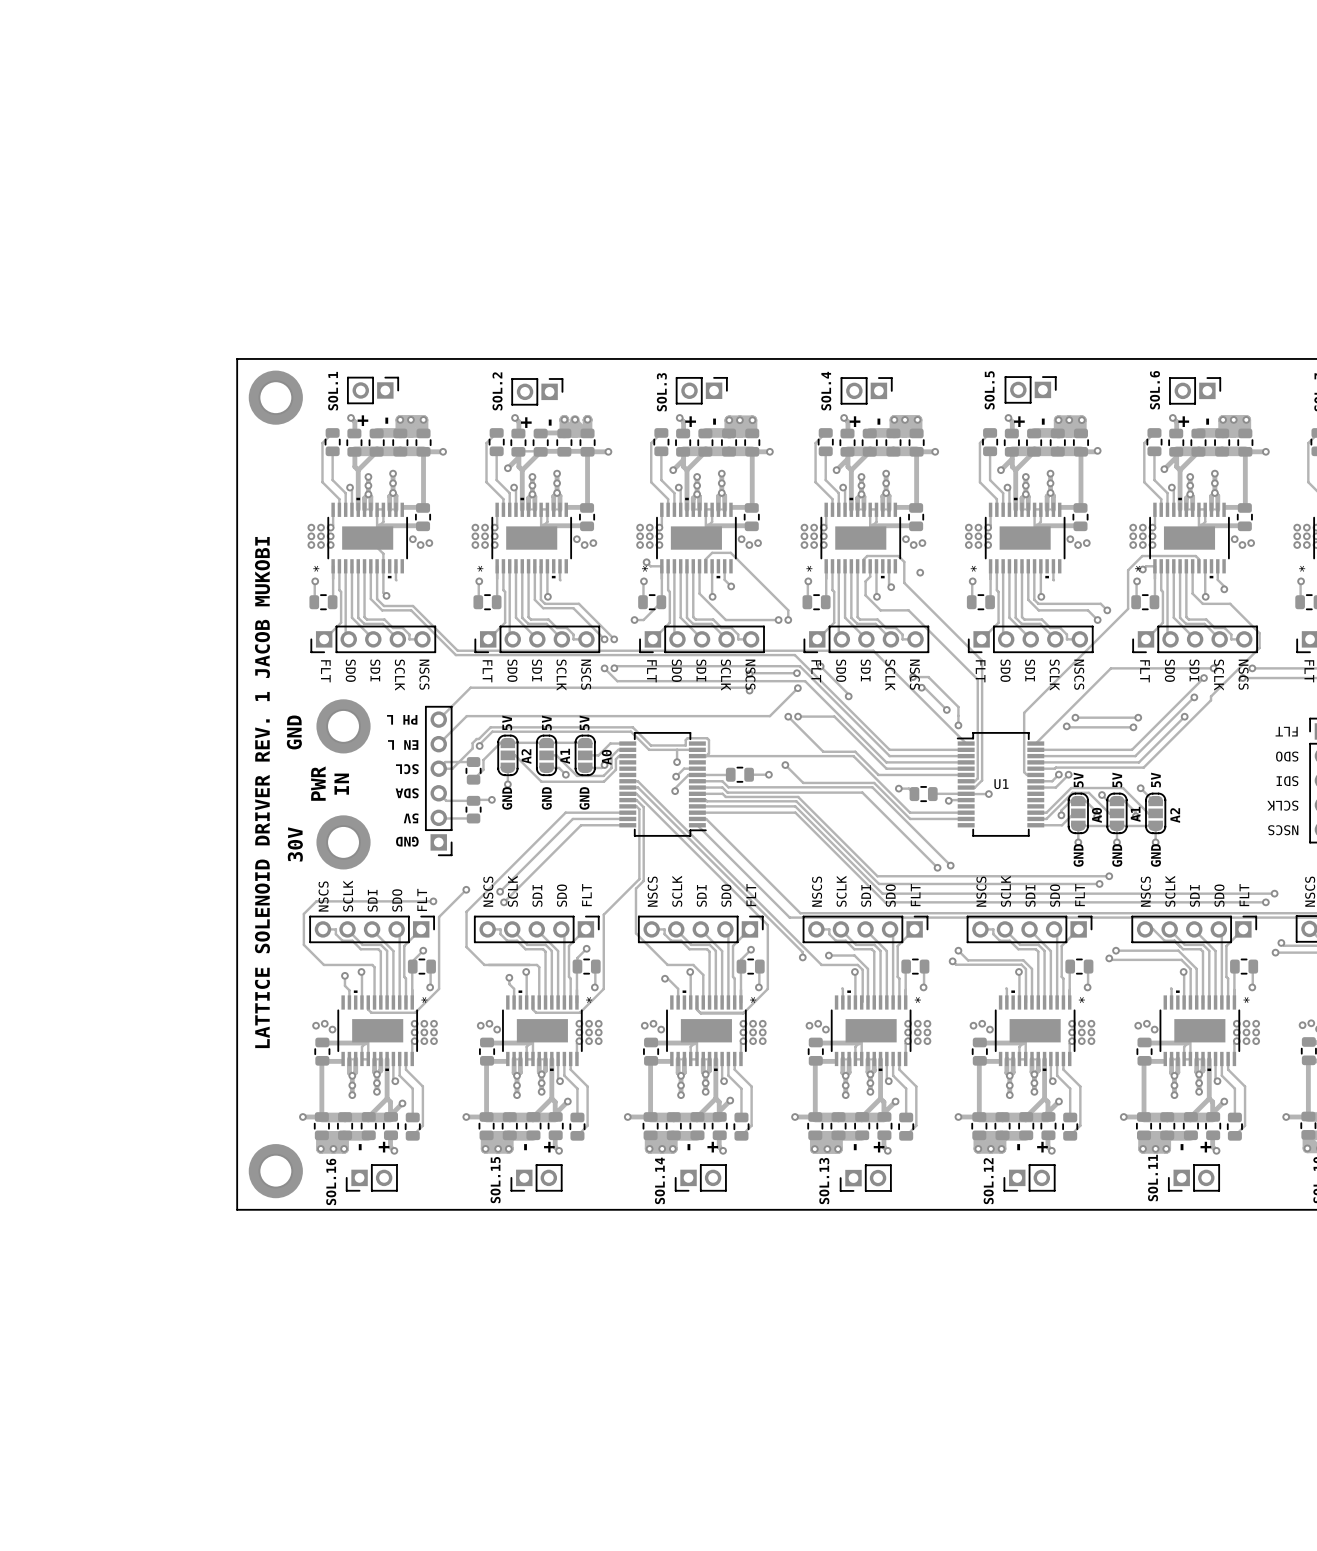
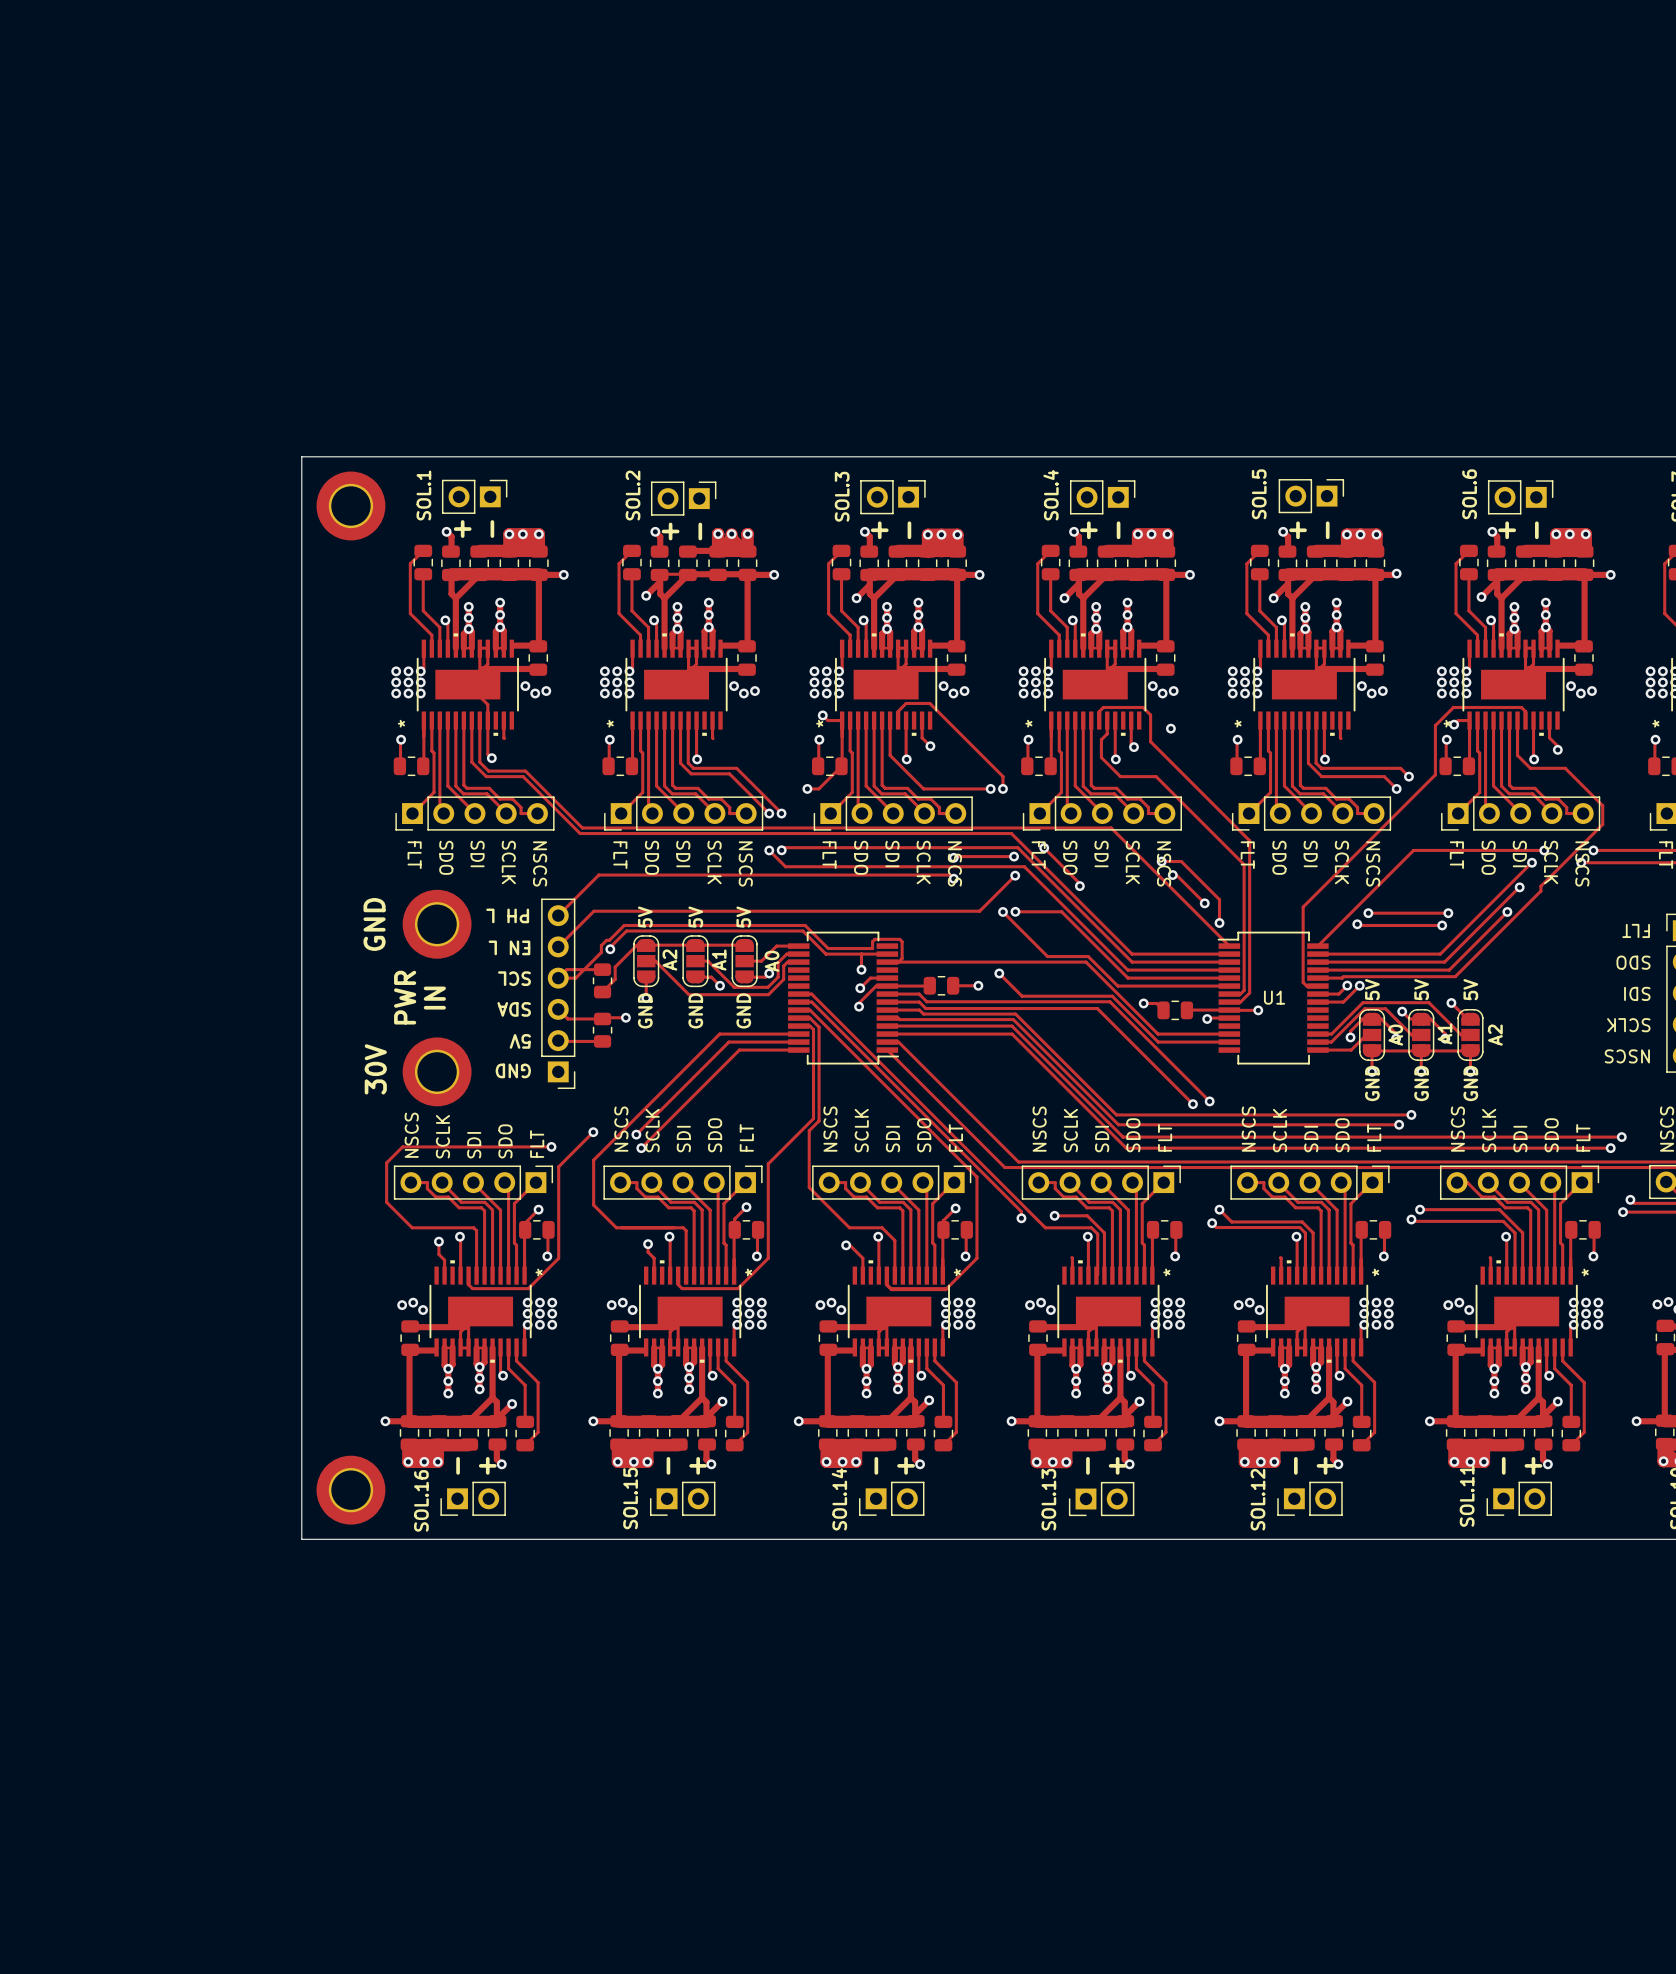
text: LATTICE SOLENOID DRIVER REV. 1 JACOB MUKOBI (262, 792) -> none

